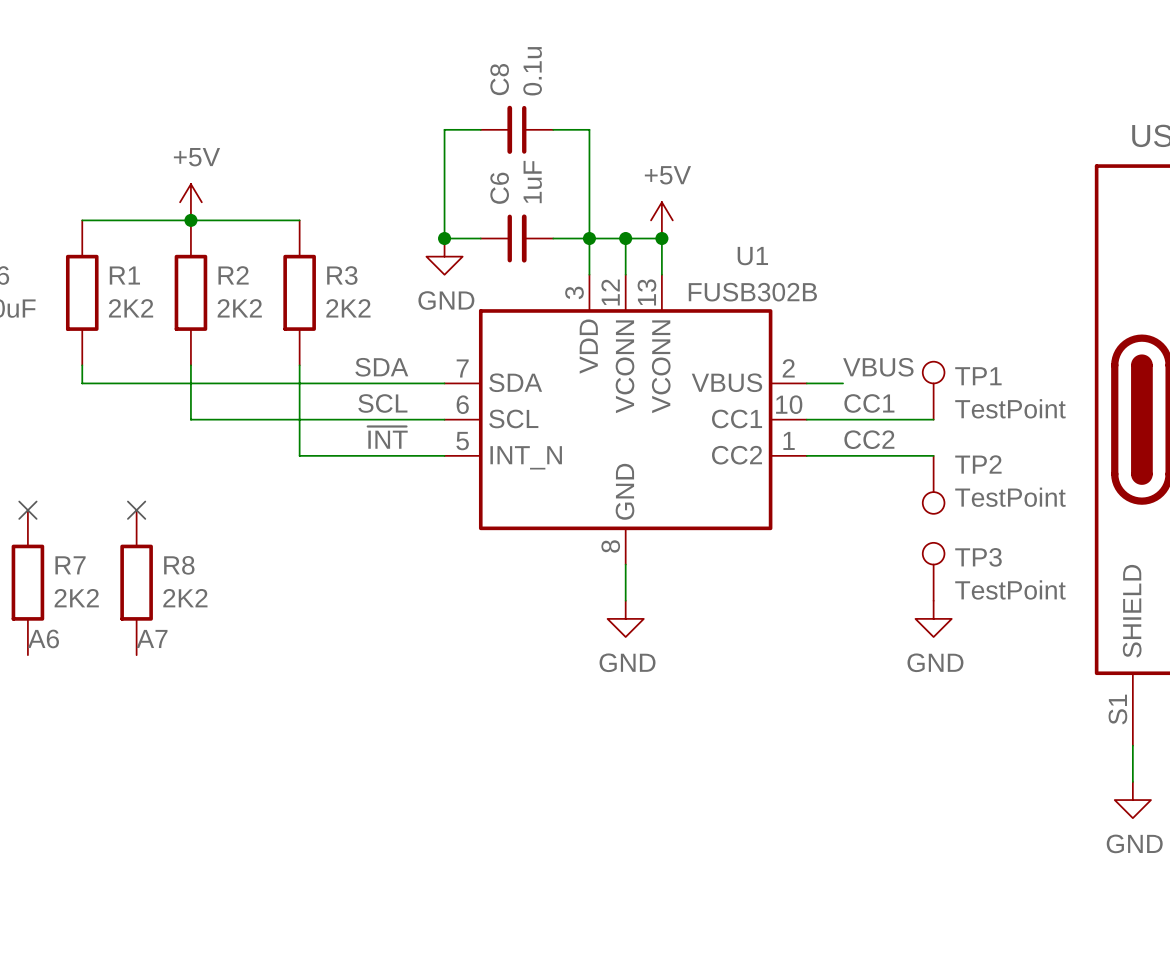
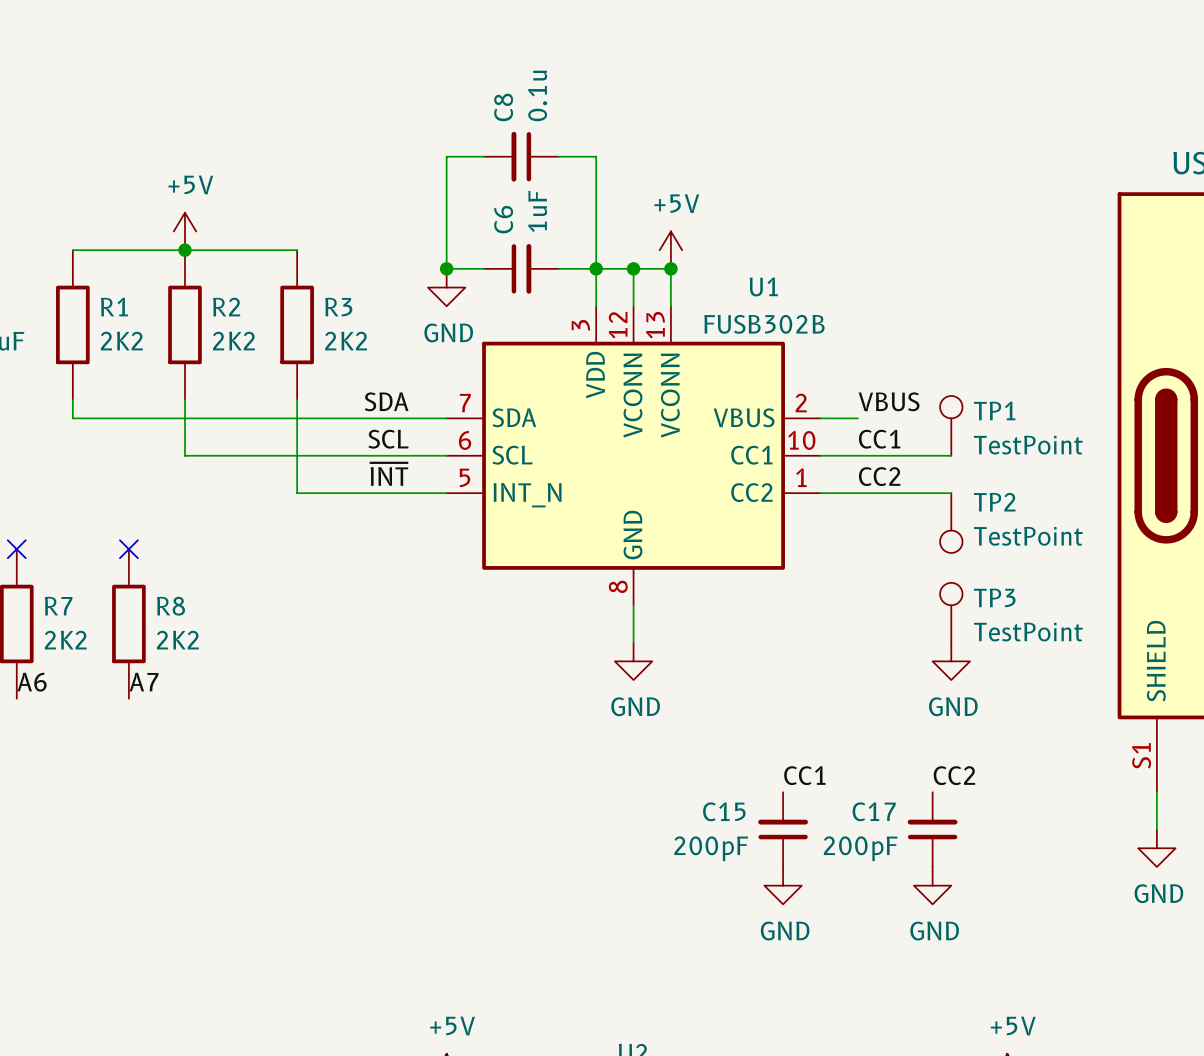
label: none -> CC1 (804, 775)
label: none -> CC2 (954, 775)
C15: none -> 200pF (783, 829)
C17: none -> 200pF (932, 829)
power symbol: none -> GND (783, 885)
power symbol: none -> GND (932, 885)

